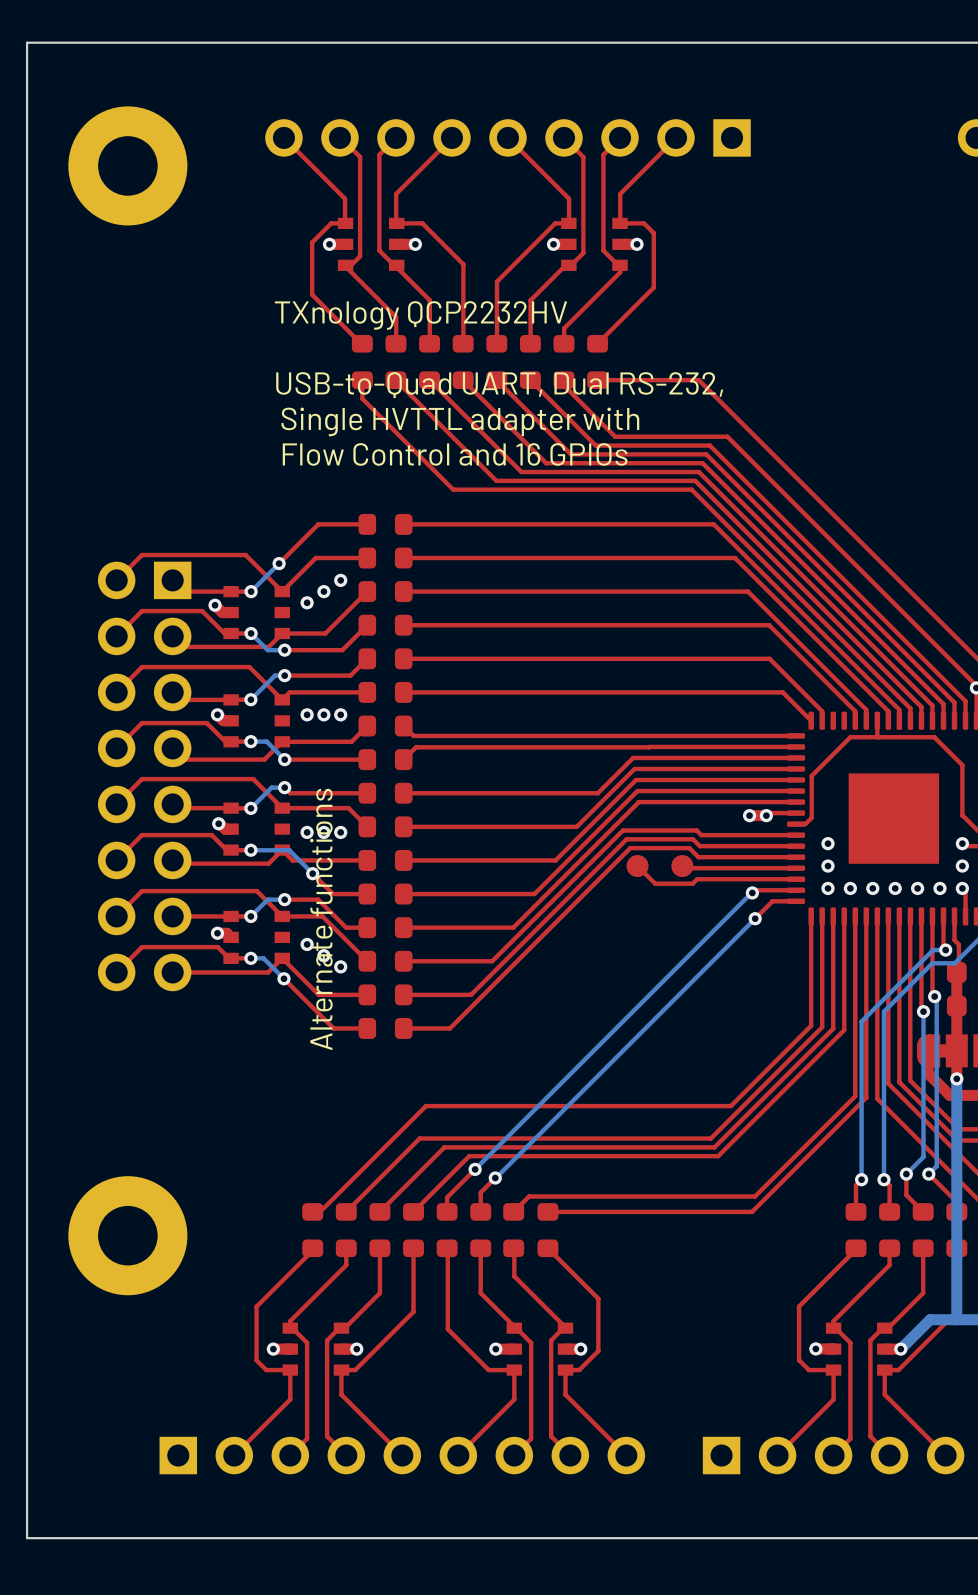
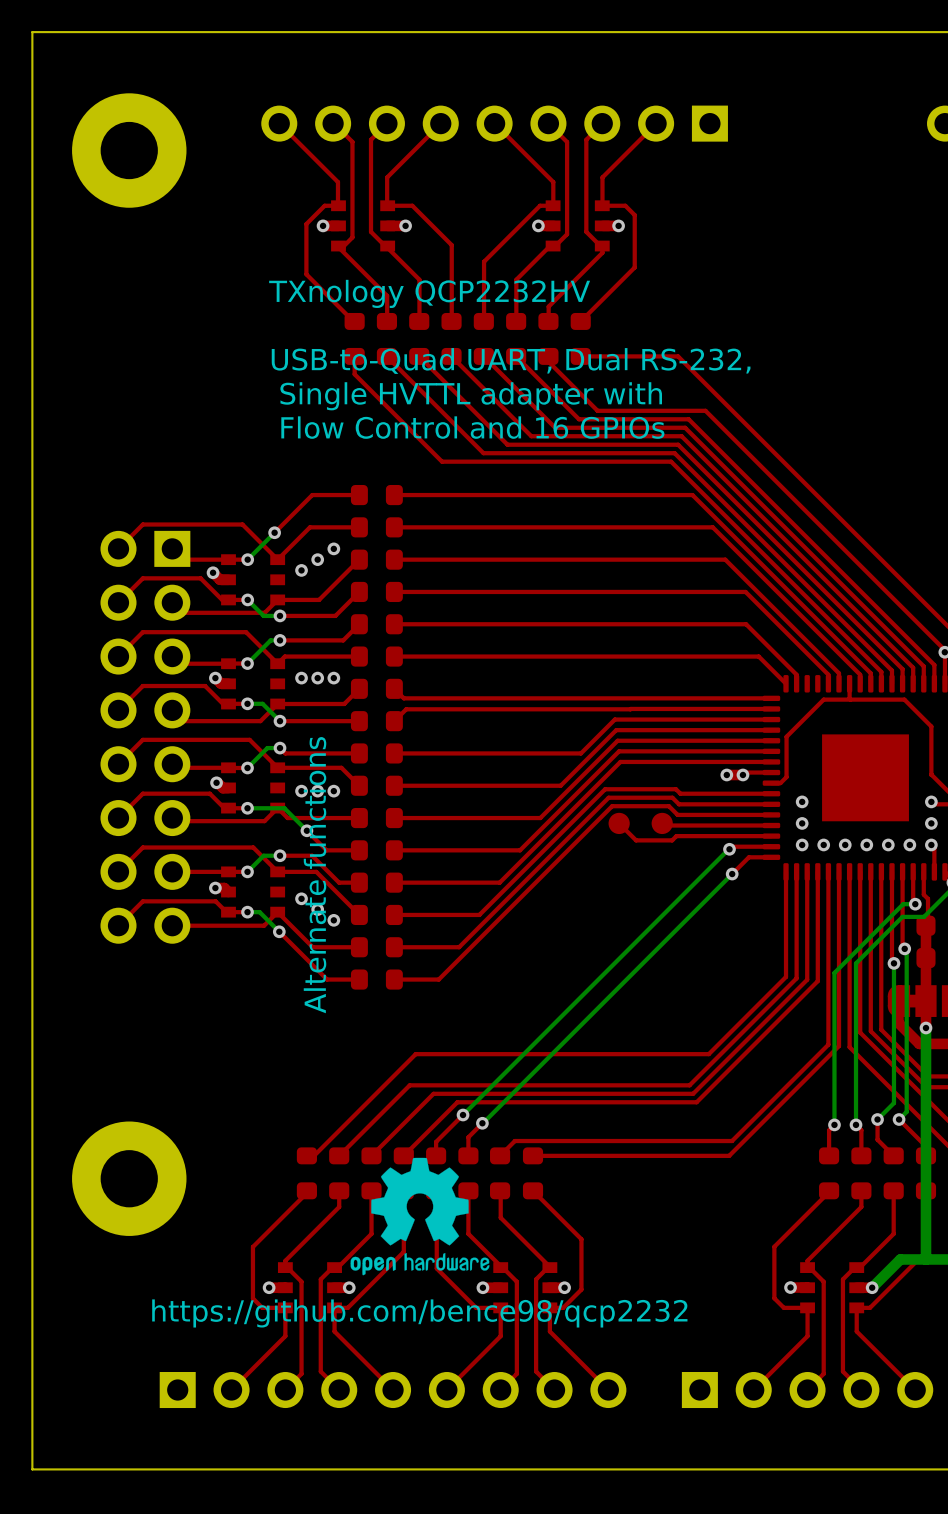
drawing: none -> [350, 1157, 490, 1276]
text: none -> https://github.com/bence98/qcp2232 (419, 1313)

